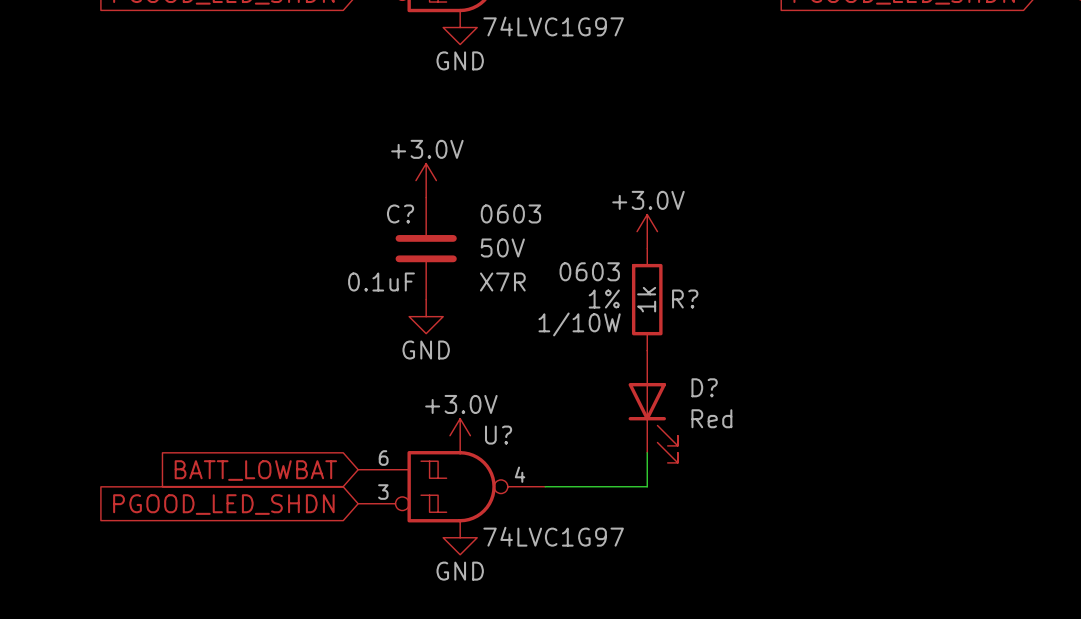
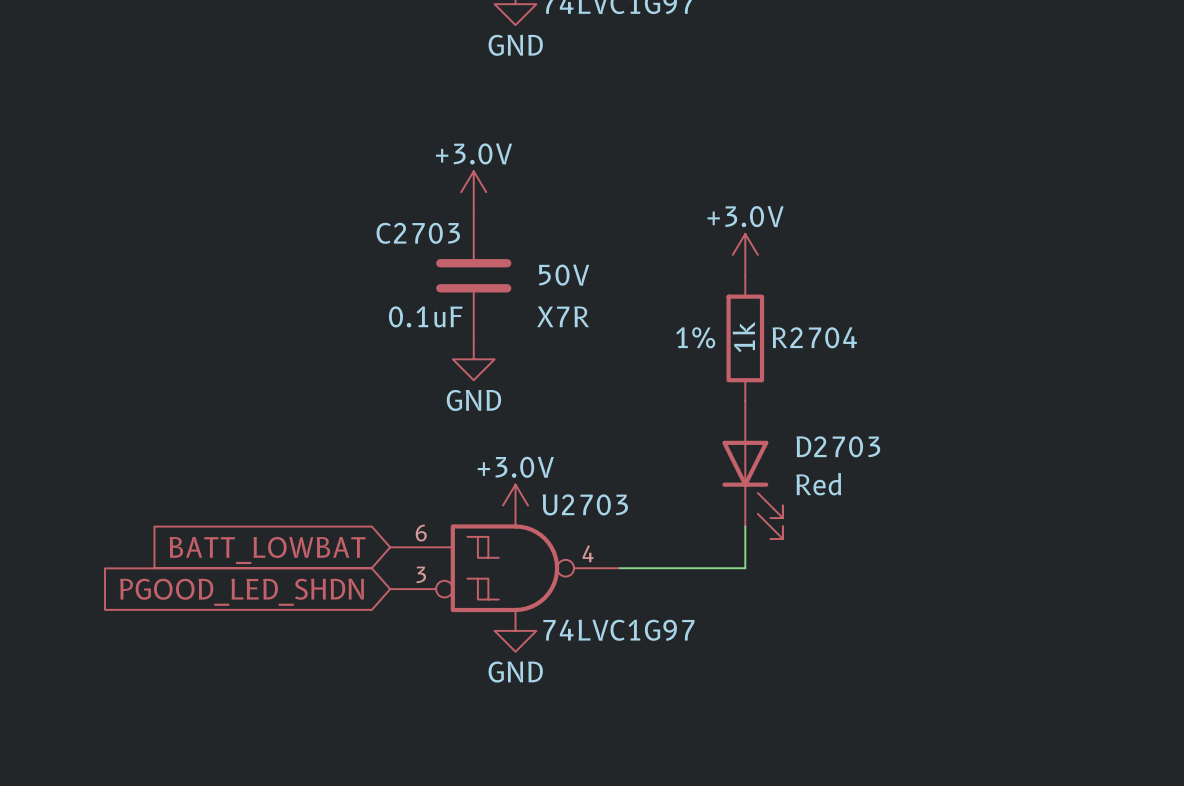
C? name: C? (400, 213) -> C2703 (418, 233)
C? text: 0603 (510, 213) -> none
R? text: 0603 (589, 271) -> none
R? name: R? (685, 299) -> R2704 (814, 337)
R? text: 1/10W (579, 324) -> none
D? name: D? (704, 387) -> D2703 (838, 446)
U? name: U? (498, 435) -> U2703 (585, 504)

